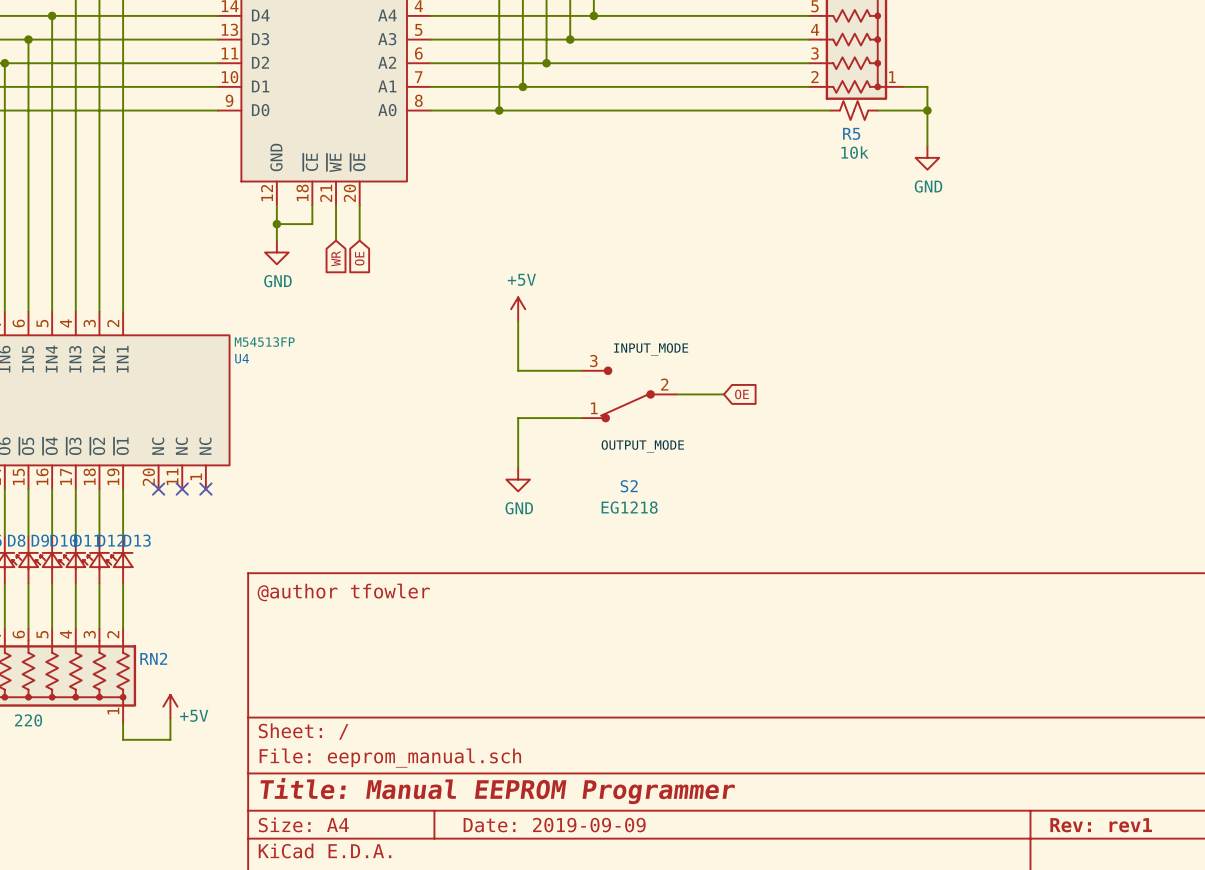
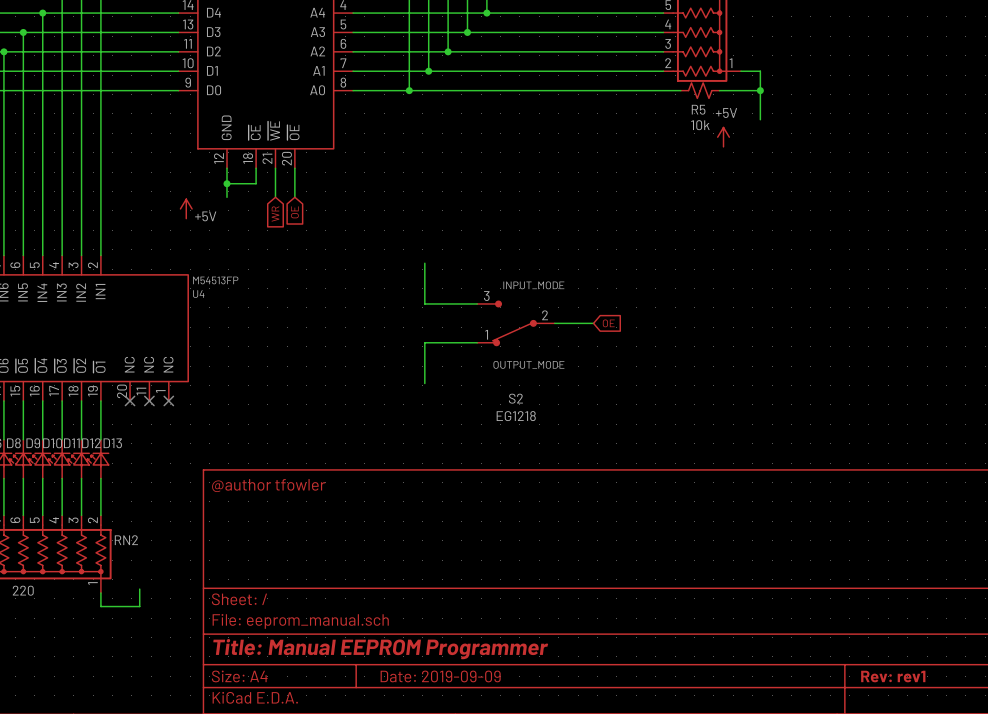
power symbol: GND (927, 157) -> none
power symbol: none -> +5V (723, 137)
power symbol: GND (276, 252) -> none
power symbol: none -> +5V (186, 208)
power symbol: +5V (518, 309) -> none
power symbol: GND (518, 479) -> none
power symbol: +5V (170, 706) -> none

